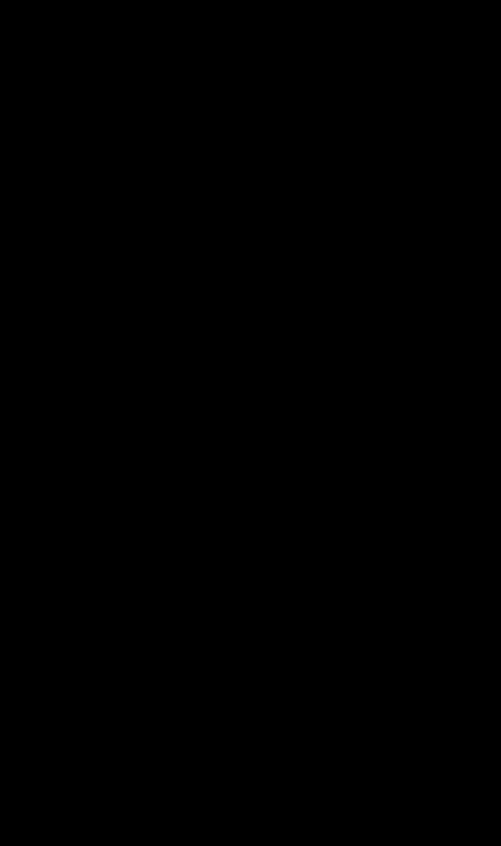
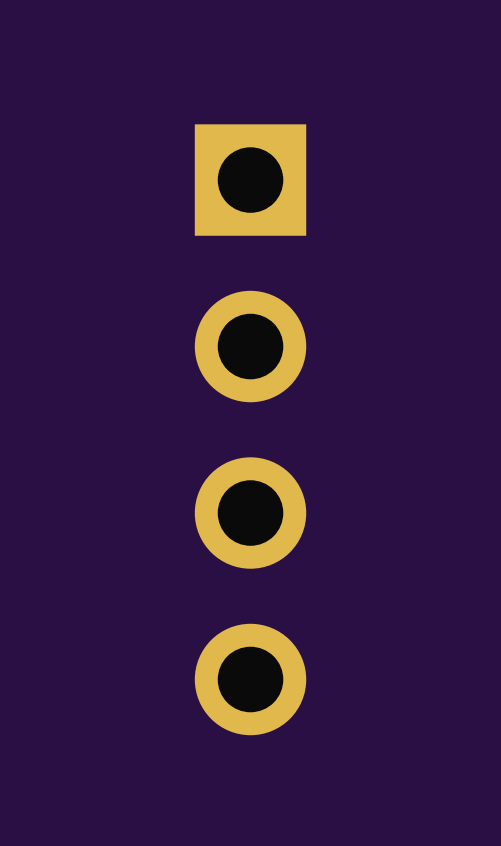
part: none -> (250, 429)

